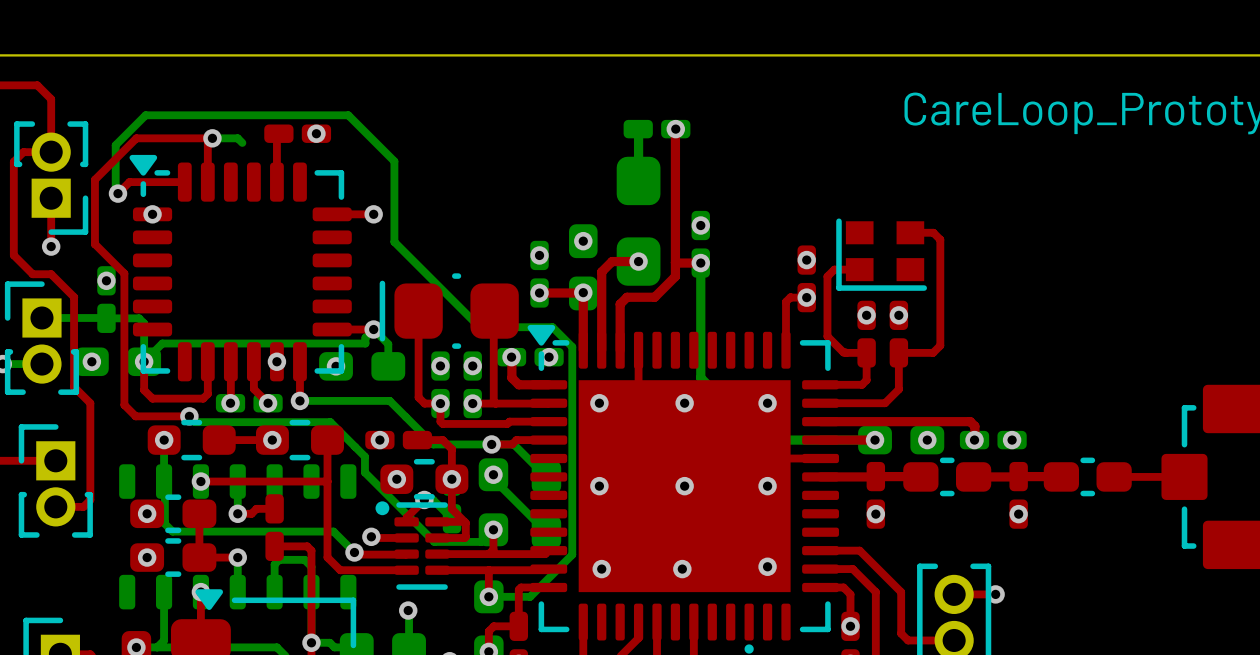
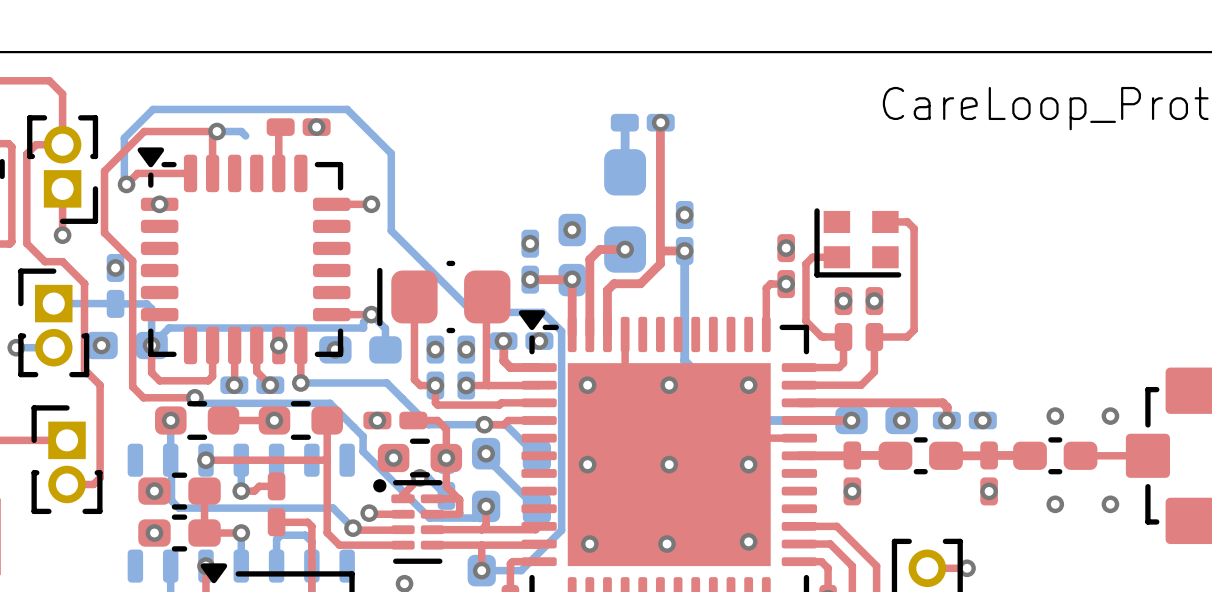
via: none -> (1055, 416)
via: none -> (1110, 416)
via: none -> (1055, 504)
via: none -> (1110, 504)

